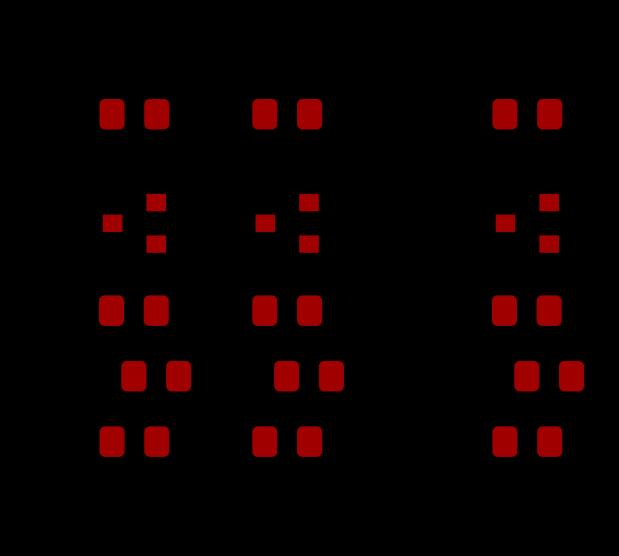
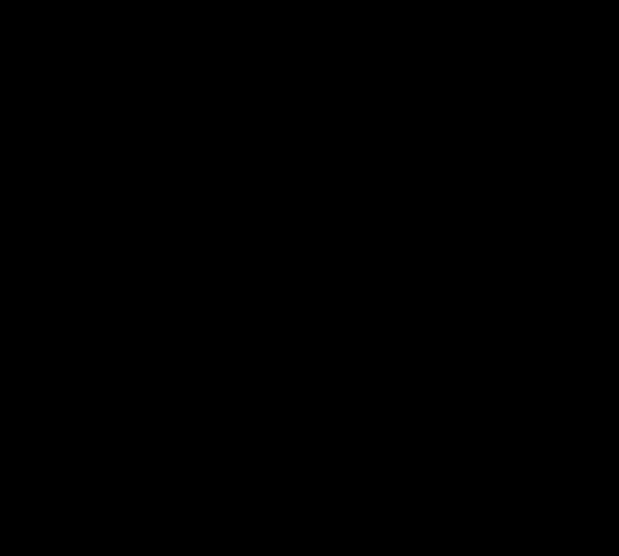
part: (134, 114) -> none
part: (287, 114) -> none
part: (527, 114) -> none
part: (134, 223) -> none
part: (287, 223) -> none
part: (527, 223) -> none
part: (133, 310) -> none
part: (287, 310) -> none
part: (526, 310) -> none
part: (156, 376) -> none
part: (309, 376) -> none
part: (549, 376) -> none
part: (134, 441) -> none
part: (287, 441) -> none
part: (527, 441) -> none

